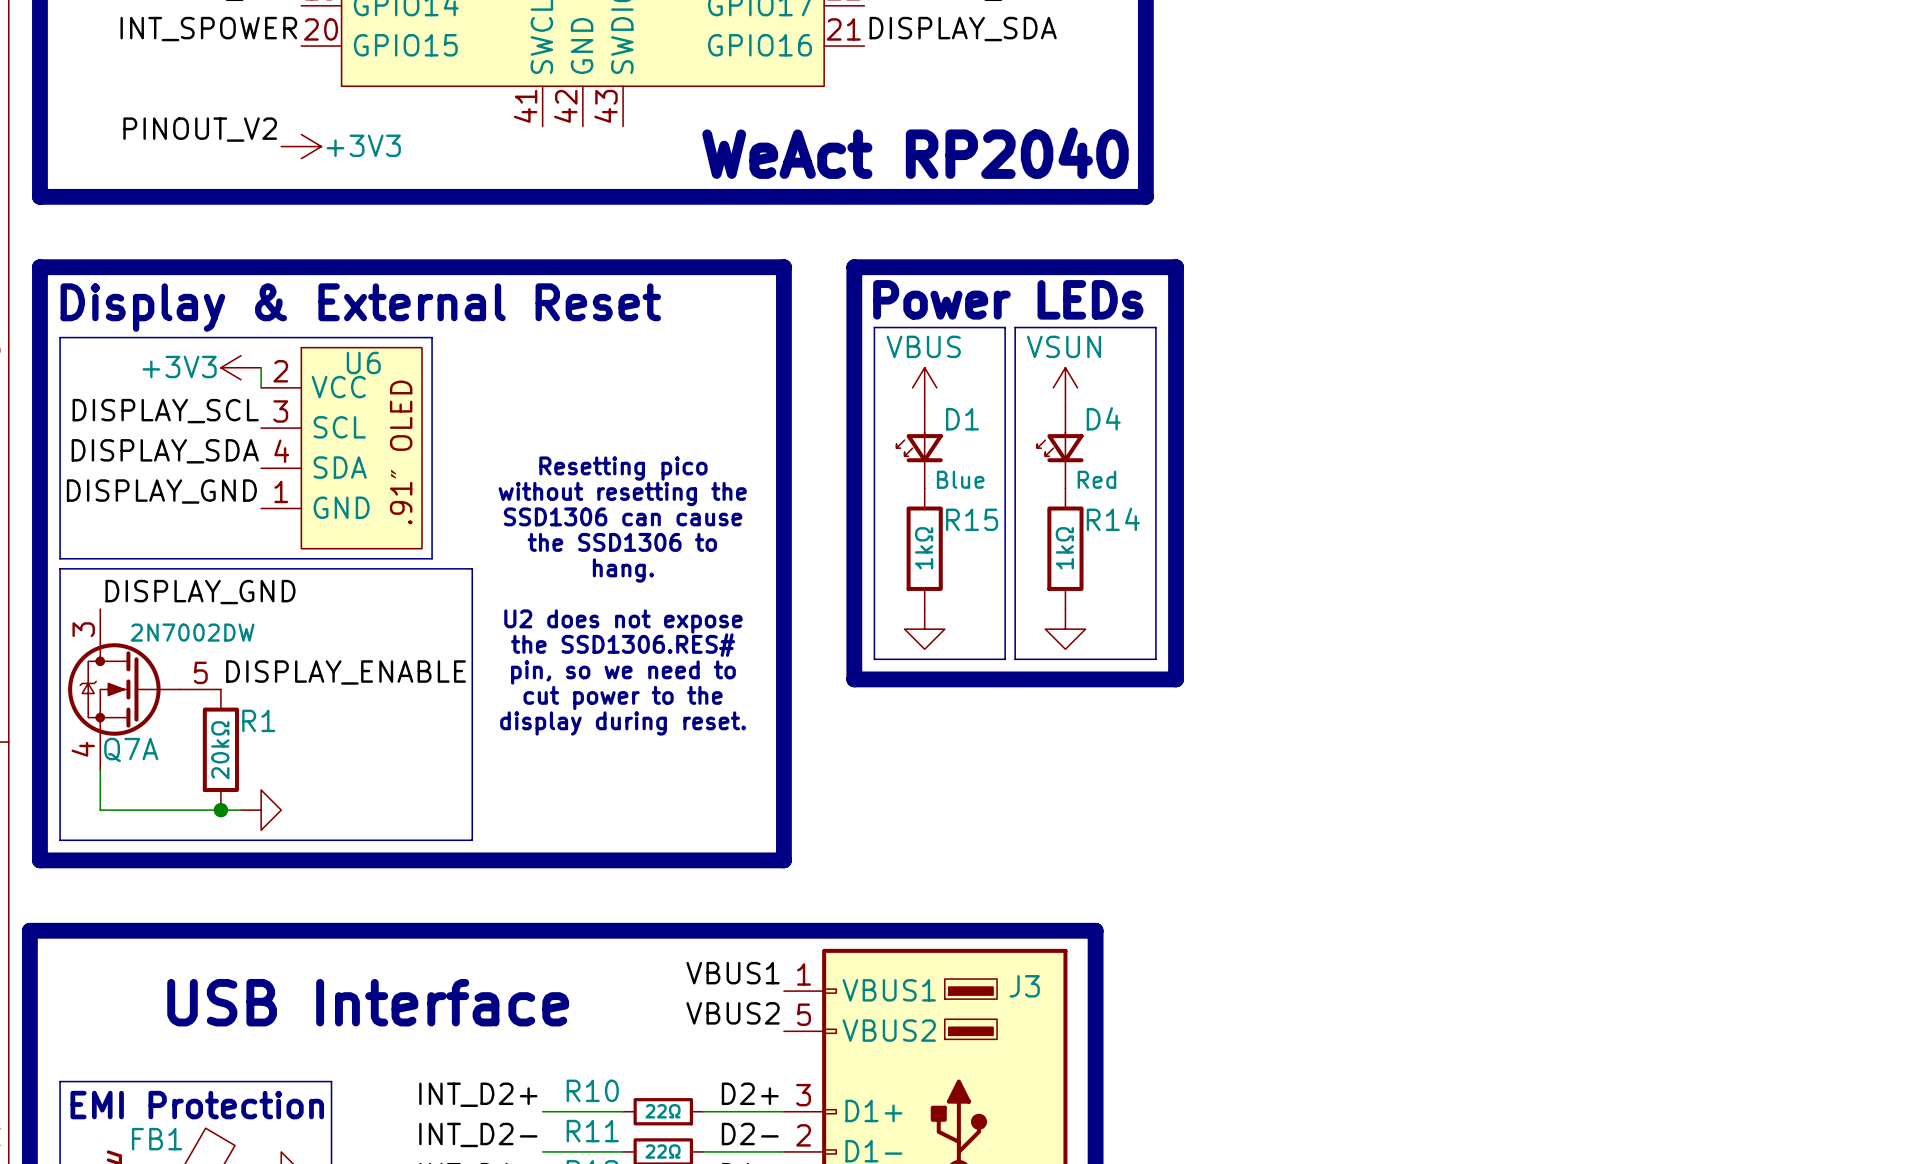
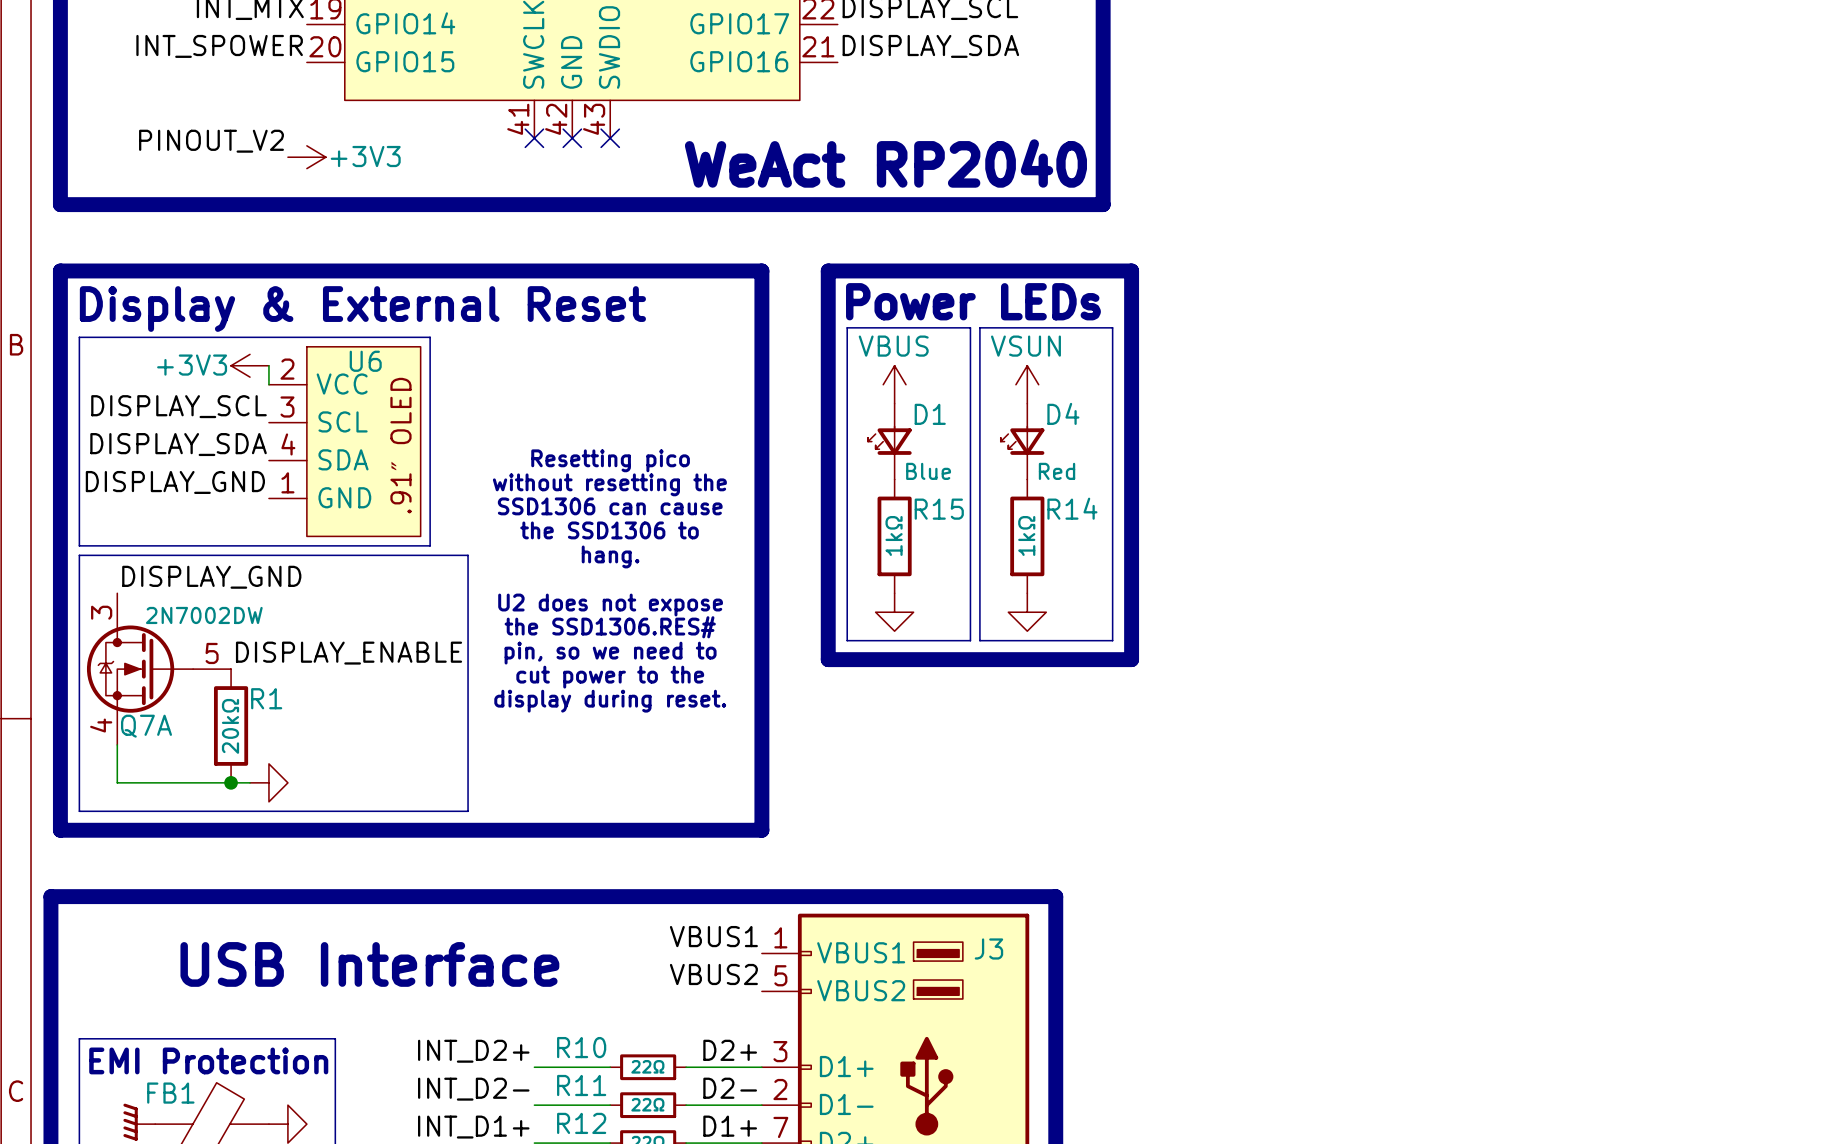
no-connect mark: none -> (534, 138)
no-connect mark: none -> (572, 138)
no-connect mark: none -> (610, 138)

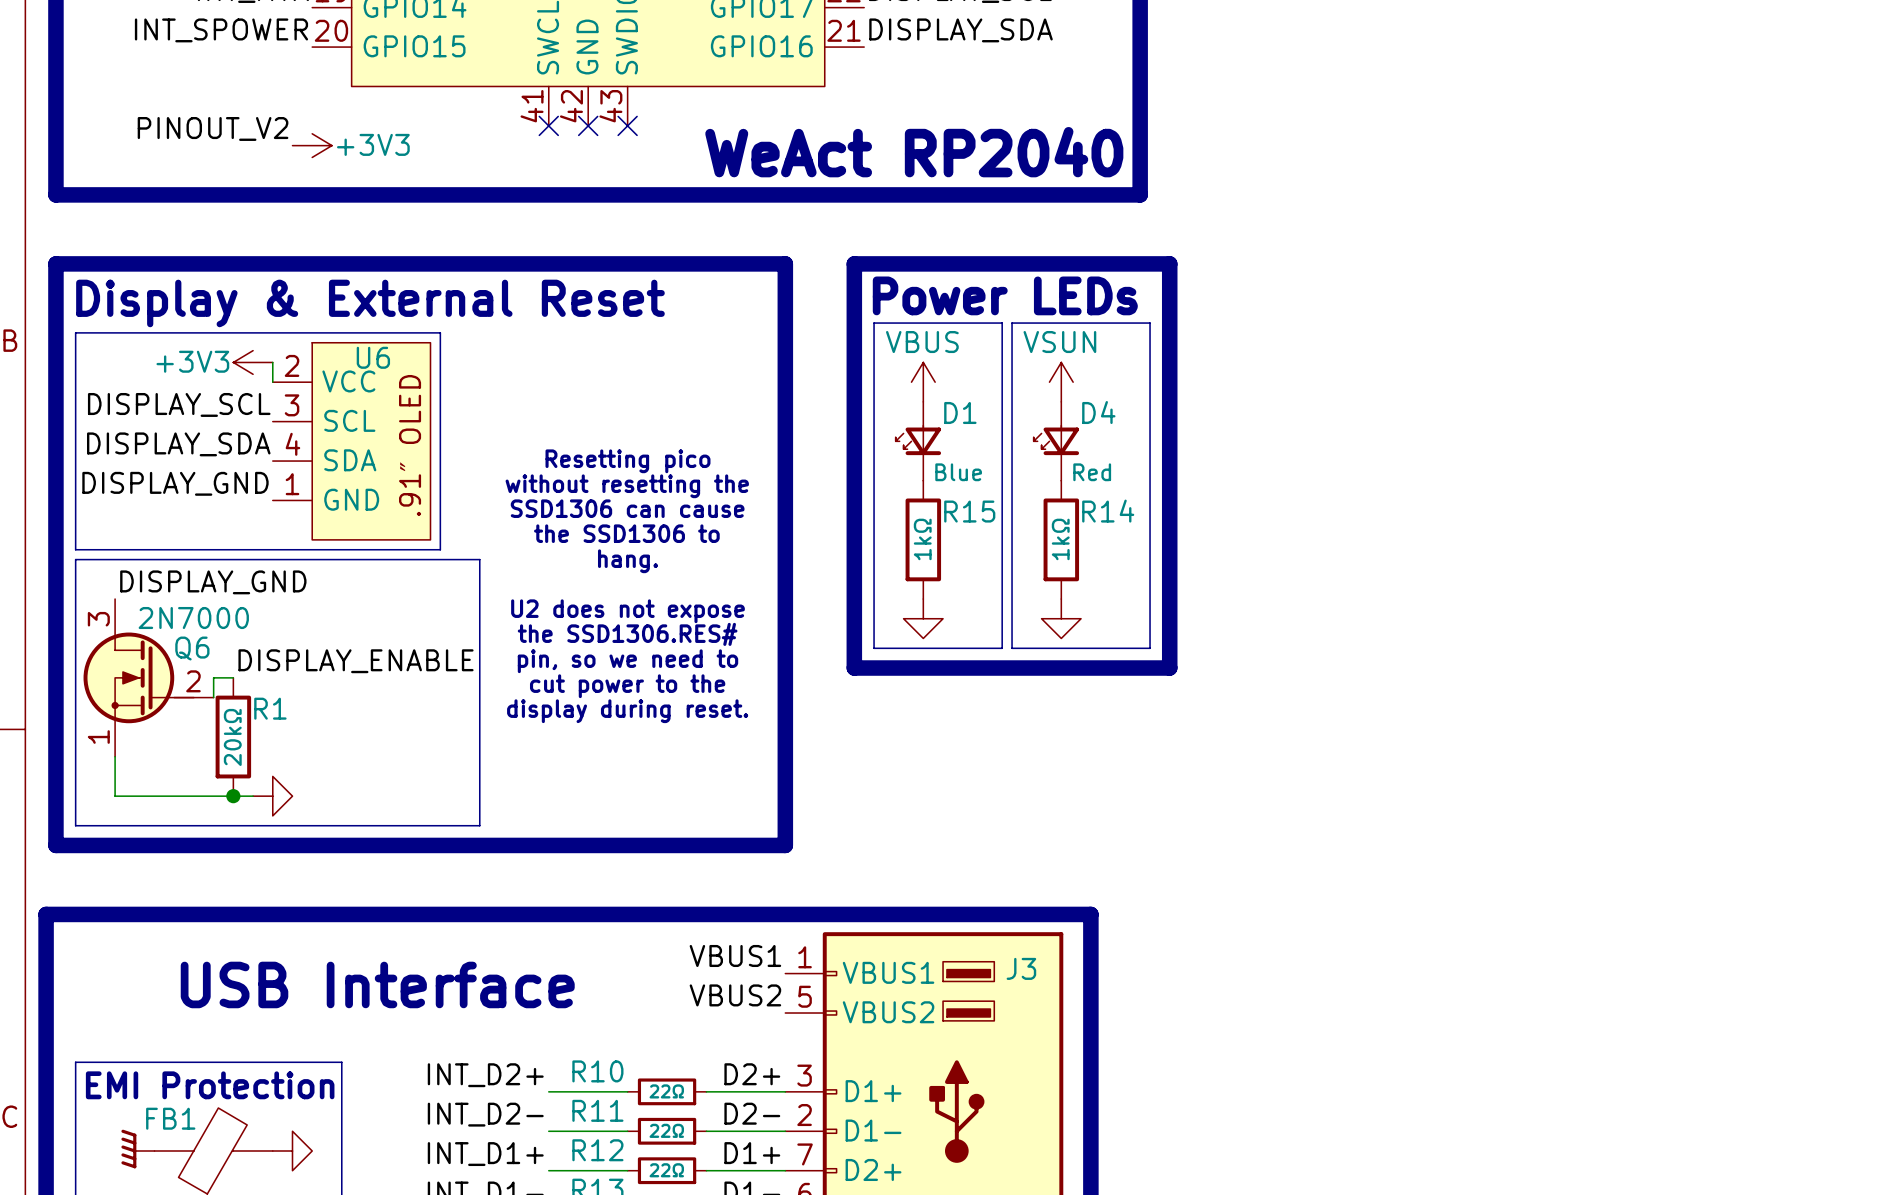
Q6: none -> 2N7000 (148, 677)
Q7A: 2N7002DW (159, 669) -> none
wire: none -> (233, 677) (213, 677) (213, 697)

